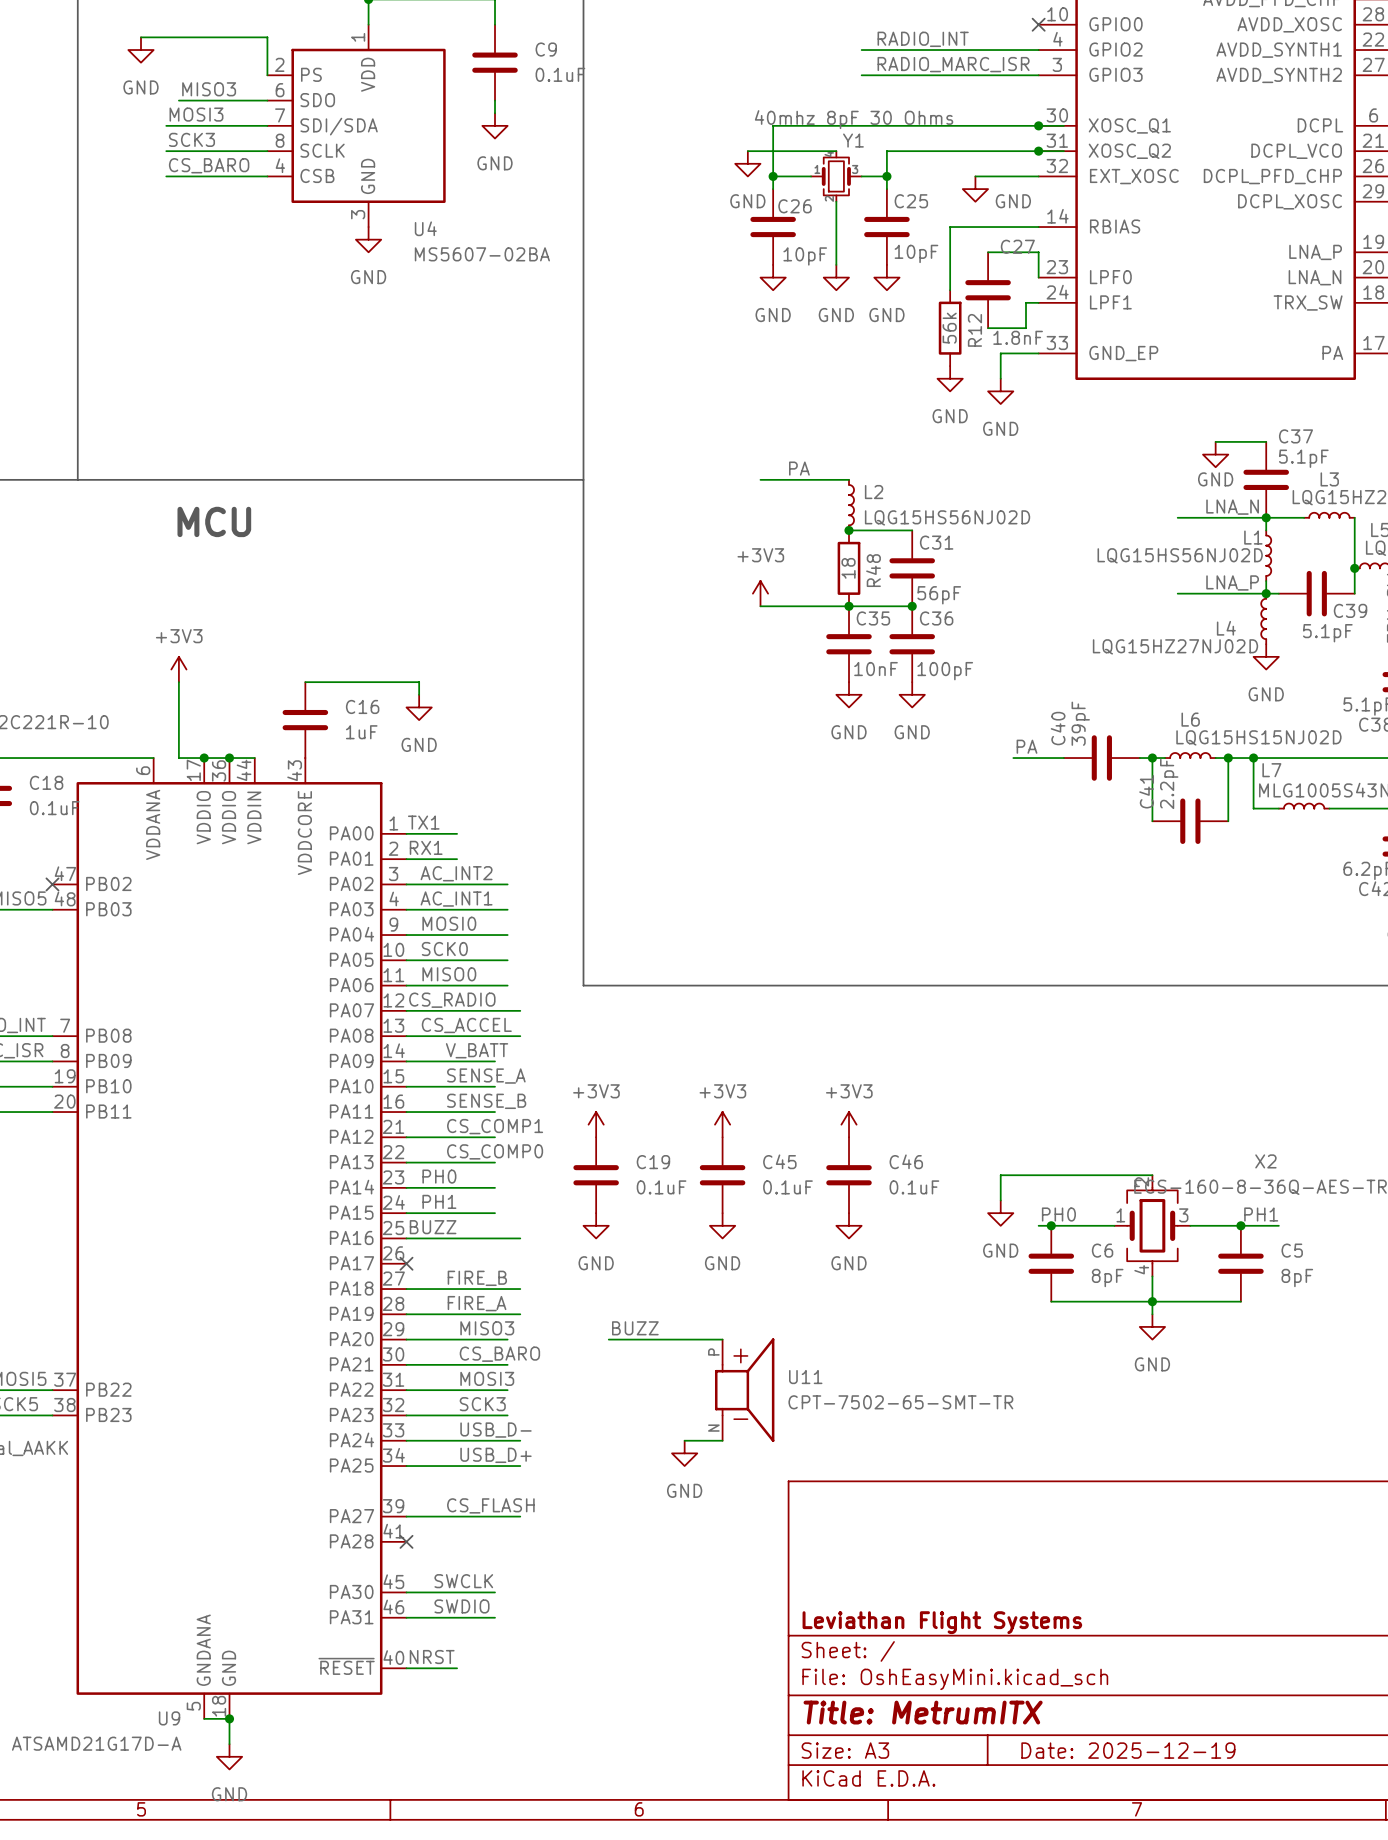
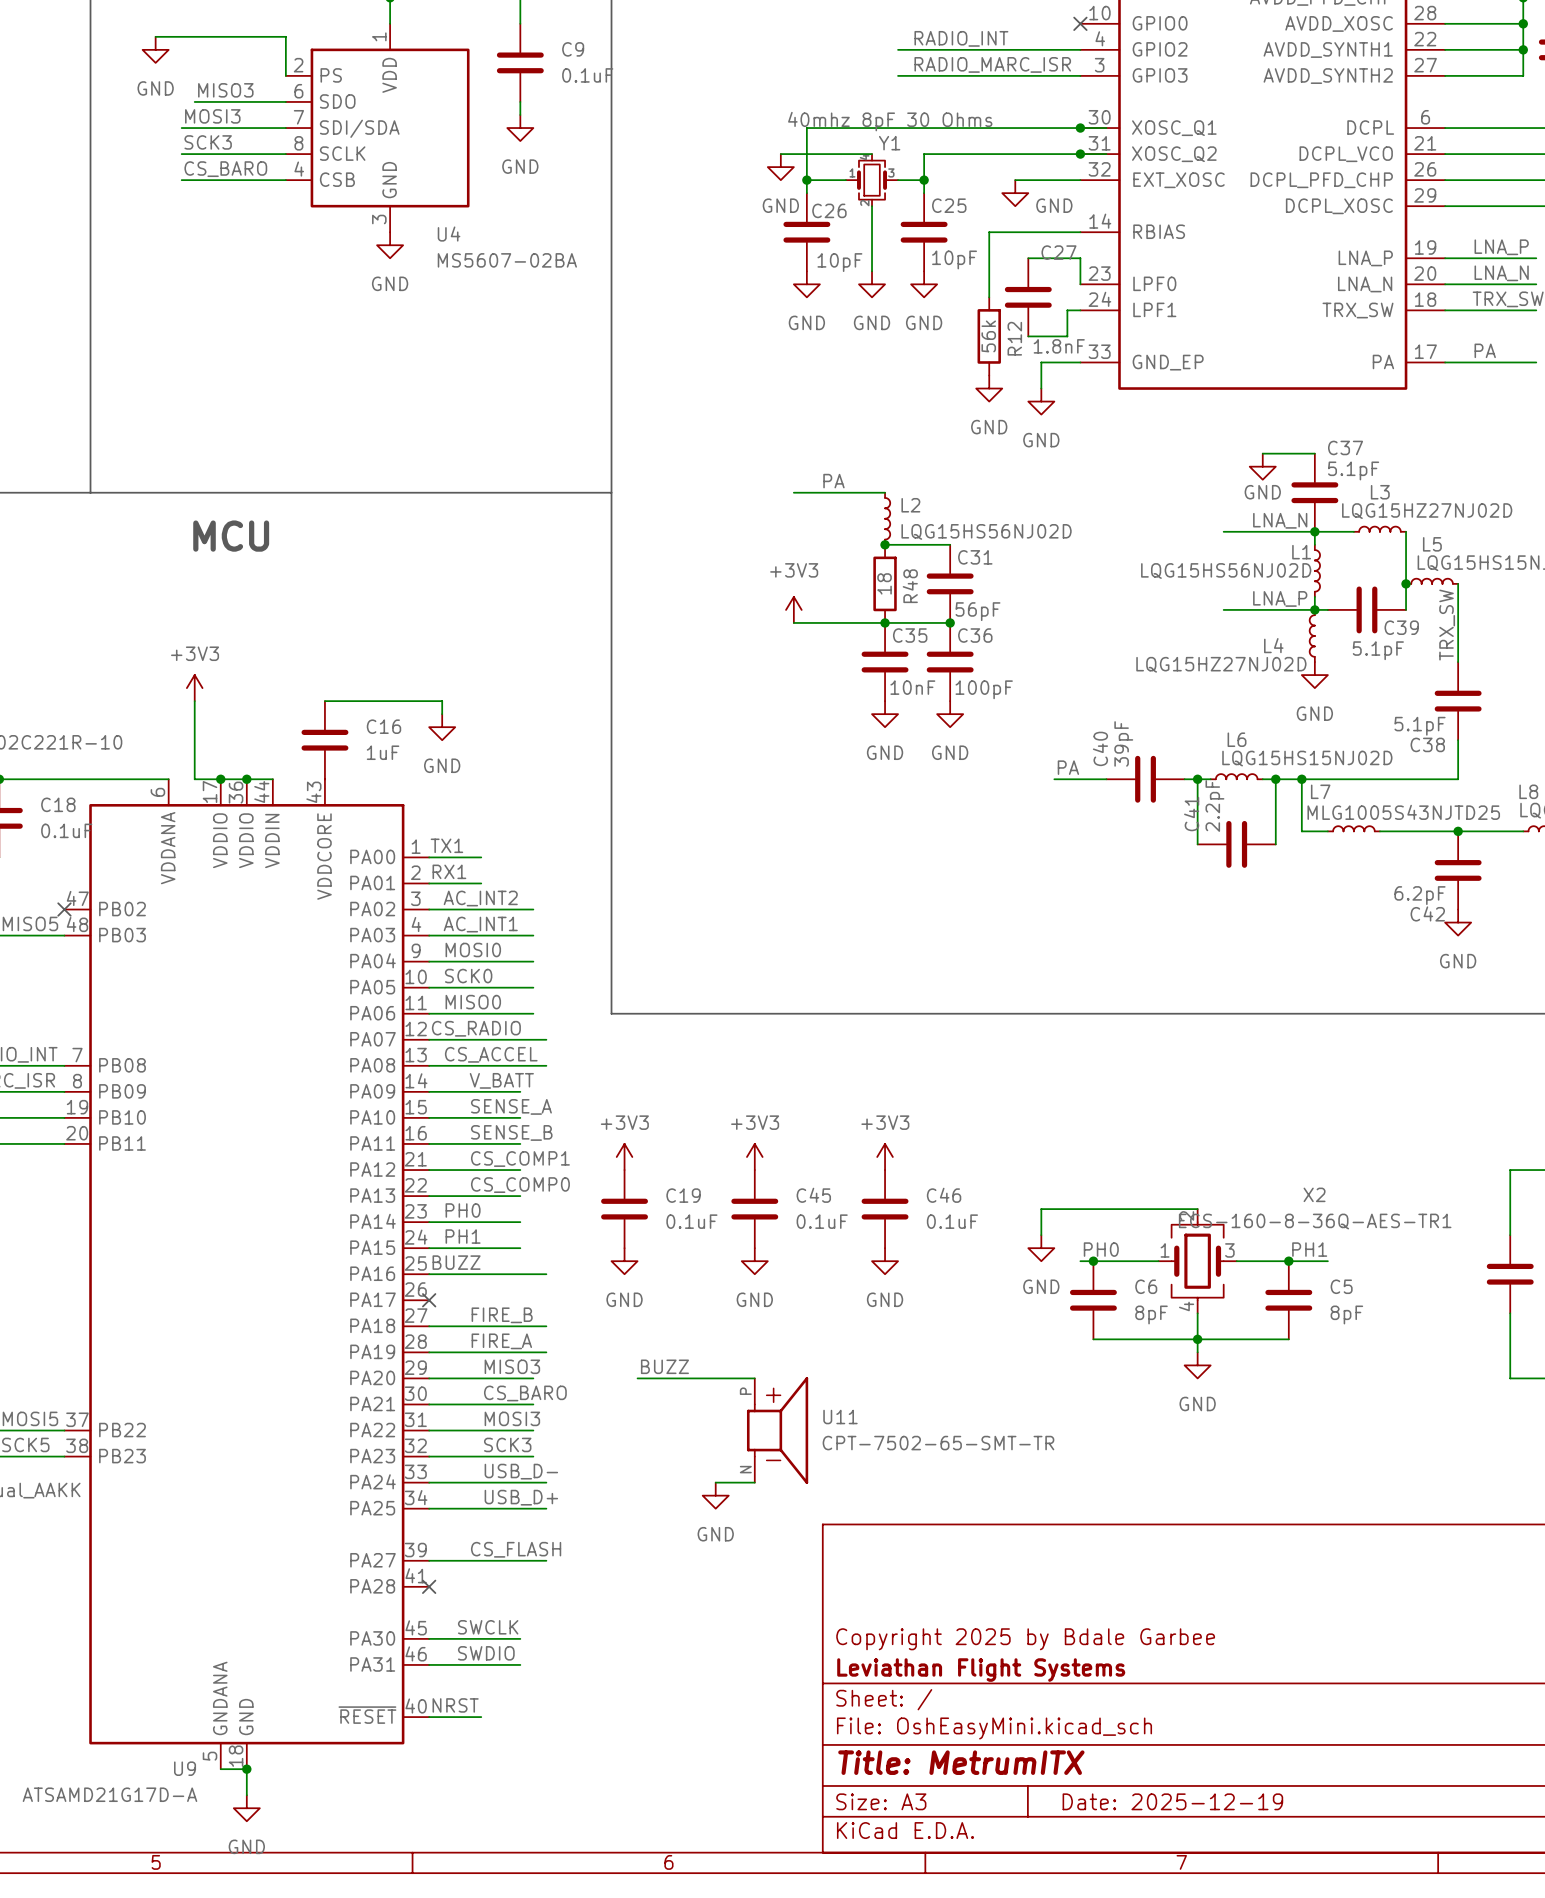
title block: none -> Copyright 2025 by Bdale Garbee (1025, 1639)

